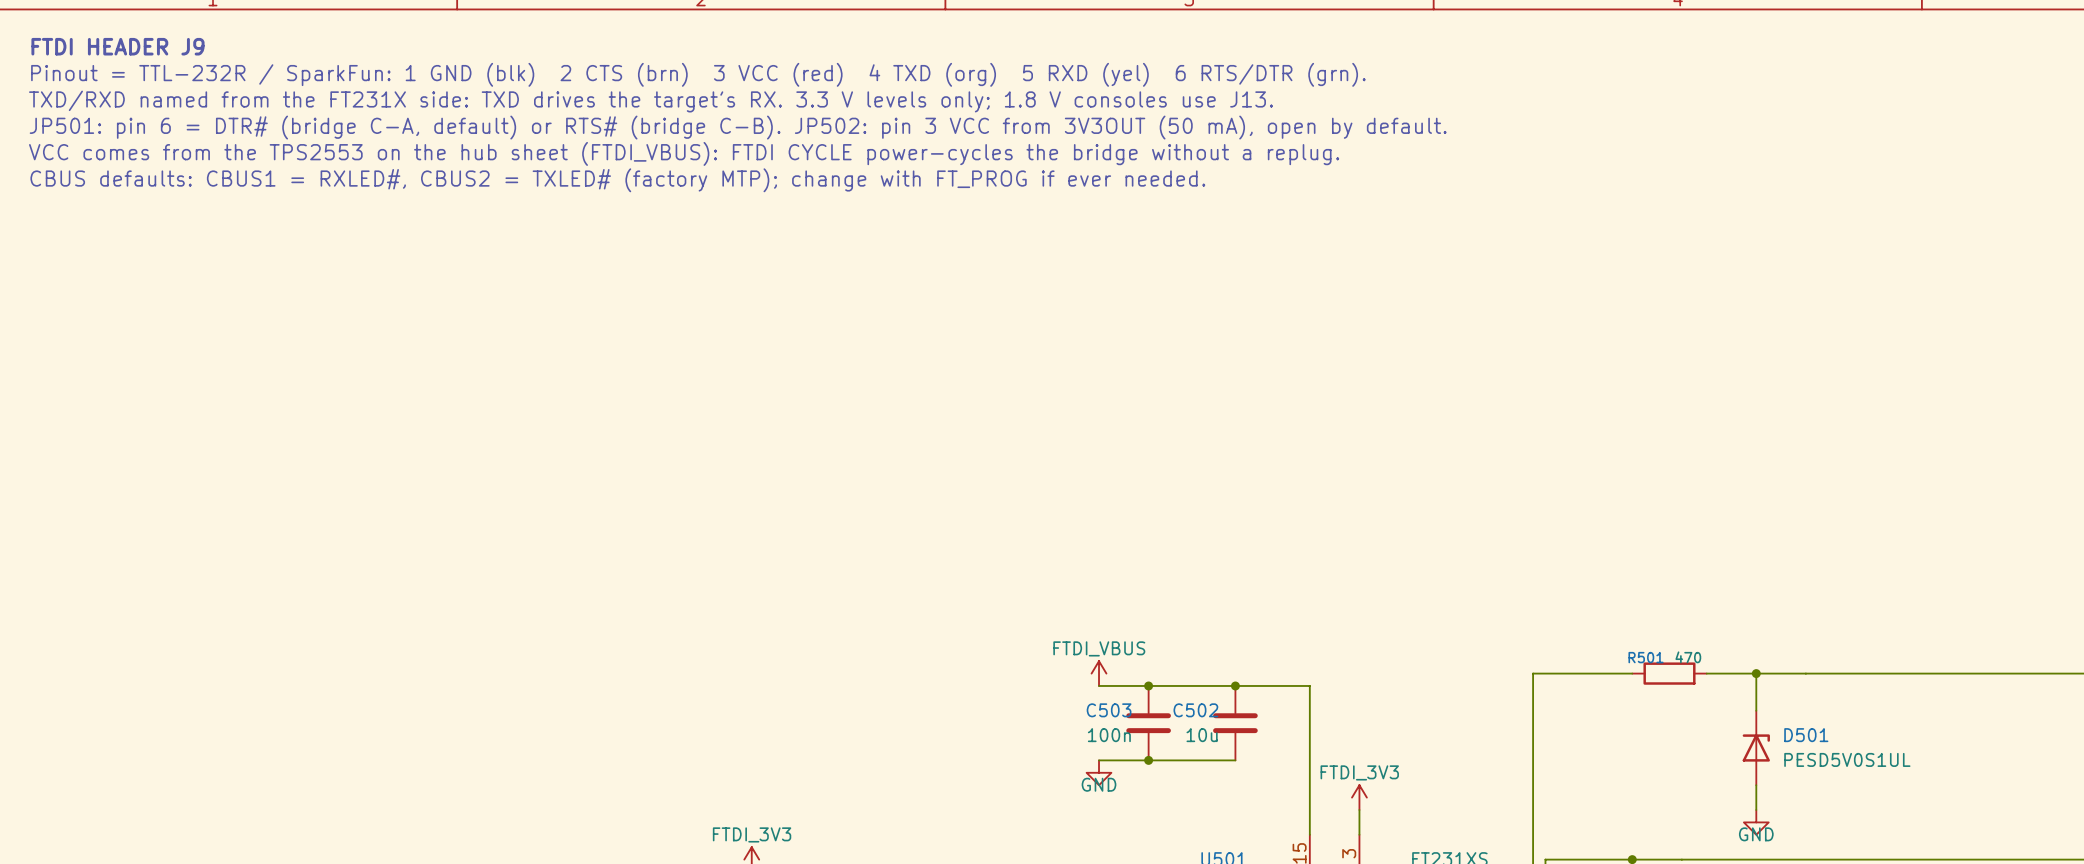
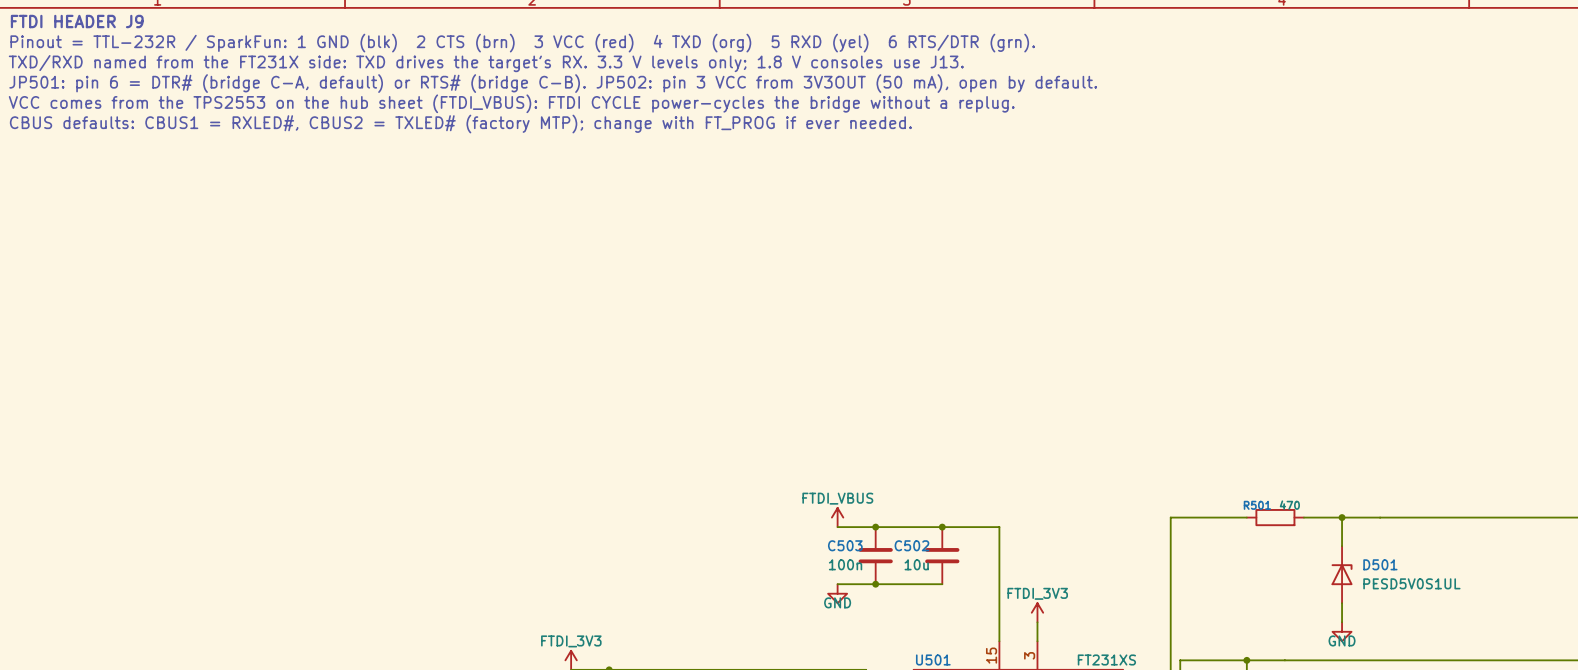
text position: FTDI HEADER J9 (117, 46) -> FTDI HEADER J9 (77, 21)
text position: Pinout = TTL-232R / SparkFun: 1 GND (blk) 2 CTS (brn) 3 VCC (red) 4 TXD (org) 5 RXD (yel) 6 RTS/DTR (grn). (698, 74) -> Pinout = TTL-232R / SparkFun: 1 GND (blk) 2 CTS (brn) 3 VCC (red) 4 TXD (org) 5 RXD (yel) 6 RTS/DTR (grn). (522, 43)
text position: TXD/RXD named from the FT231X side: TXD drives the target's RX. 3.3 V levels only; 1.8 V consoles use J13. (650, 101) -> TXD/RXD named from the FT231X side: TXD drives the target's RX. 3.3 V levels only; 1.8 V consoles use J13. (486, 63)
text position: JP501: pin 6 = DTR# (bridge C-A, default) or RTS# (bridge C-B). JP502: pin 3 VCC from 3V3OUT (50 mA), open by default. (738, 127) -> JP501: pin 6 = DTR# (bridge C-A, default) or RTS# (bridge C-B). JP502: pin 3 VCC from 3V3OUT (50 mA), open by default. (553, 83)
text position: VCC comes from the TPS2553 on the hub sheet (FTDI_VBUS): FTDI CYCLE power-cycles the bridge without a replug. (684, 153) -> VCC comes from the TPS2553 on the hub sheet (FTDI_VBUS): FTDI CYCLE power-cycles the bridge without a replug. (511, 103)
text position: CBUS defaults: CBUS1 = RXLED#, CBUS2 = TXLED# (factory MTP); change with FT_PROG if ever needed. (617, 180) -> CBUS defaults: CBUS1 = RXLED#, CBUS2 = TXLED# (factory MTP); change with FT_PROG if ever needed. (460, 124)

